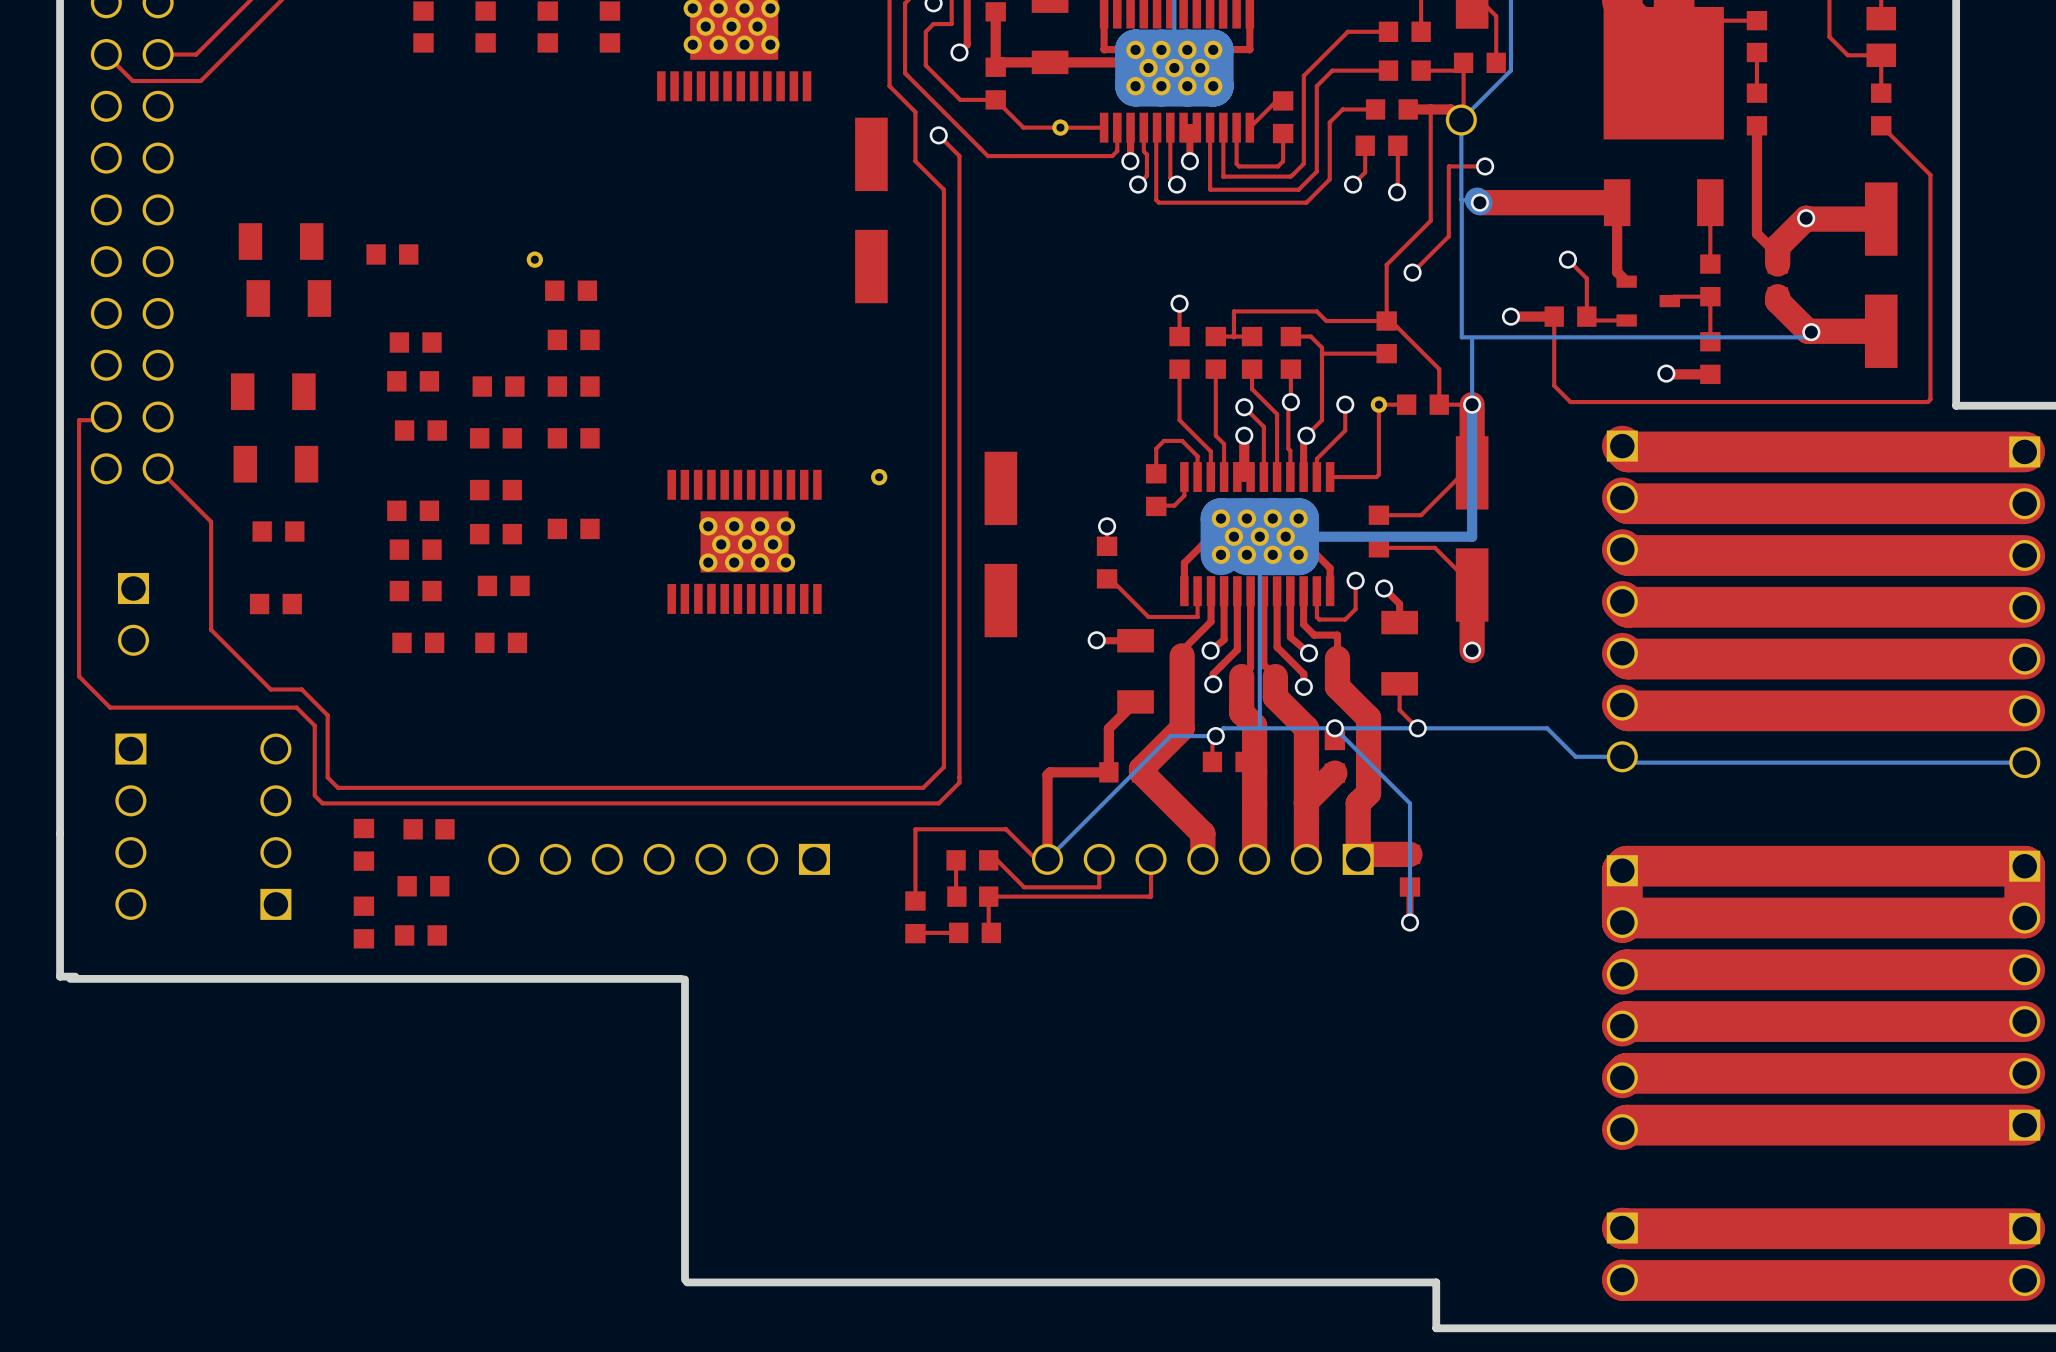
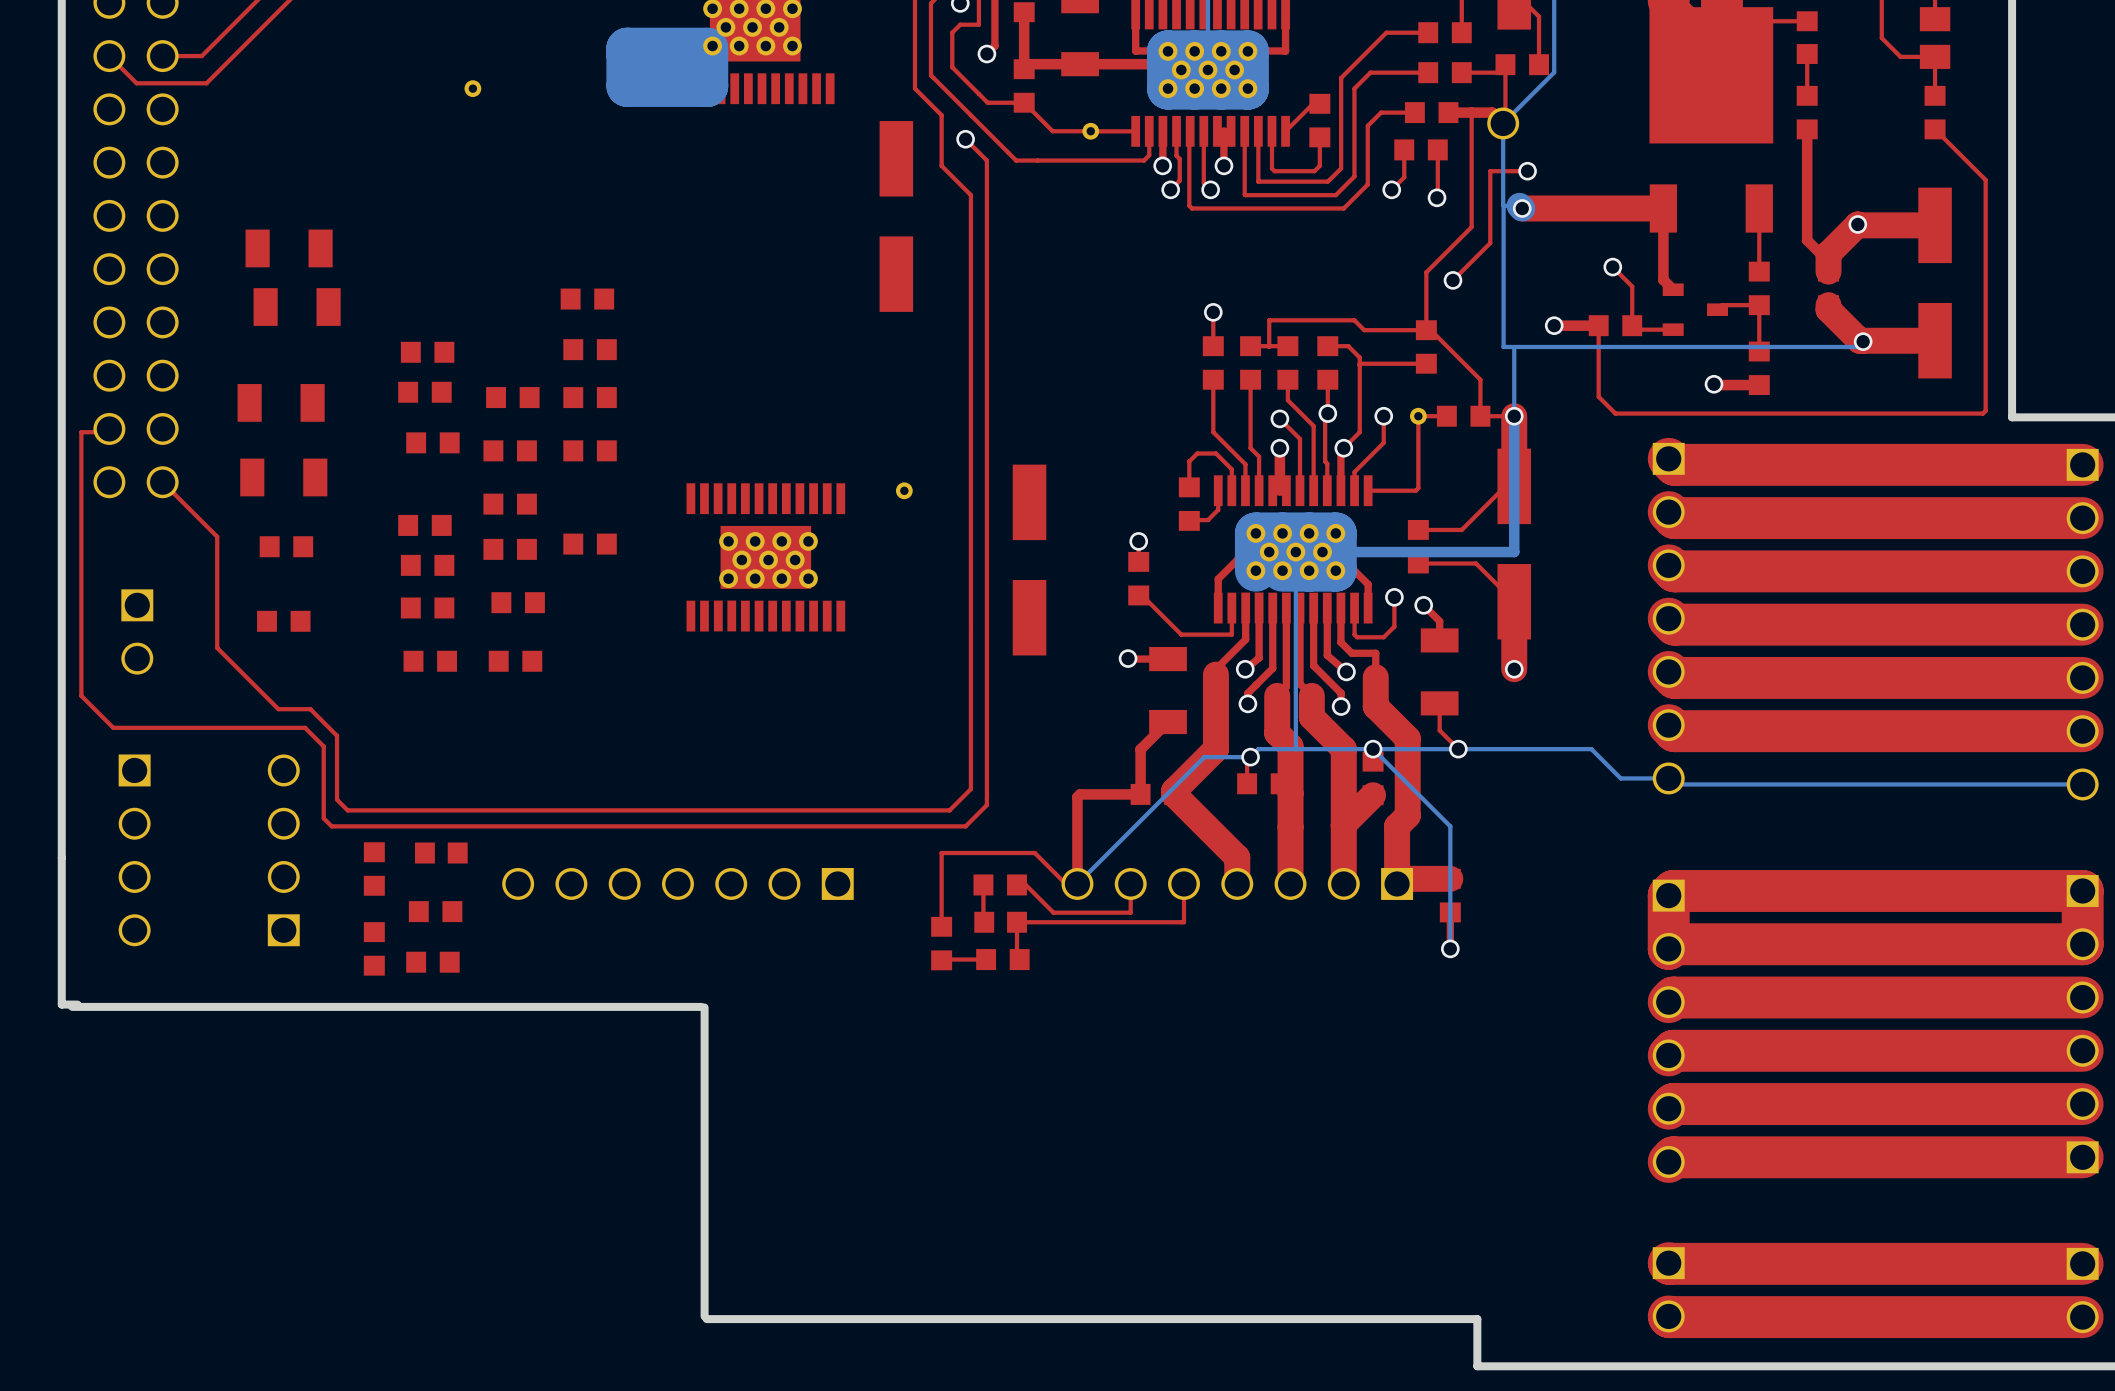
part: (423, 27) -> none
part: (485, 27) -> none
part: (547, 27) -> none
part: (609, 27) -> none
bottom track: none -> (707, 85) (707, 48) (627, 48) (627, 85) (707, 85)
part: (392, 254) -> none
part position: (534, 259) -> (472, 88)

